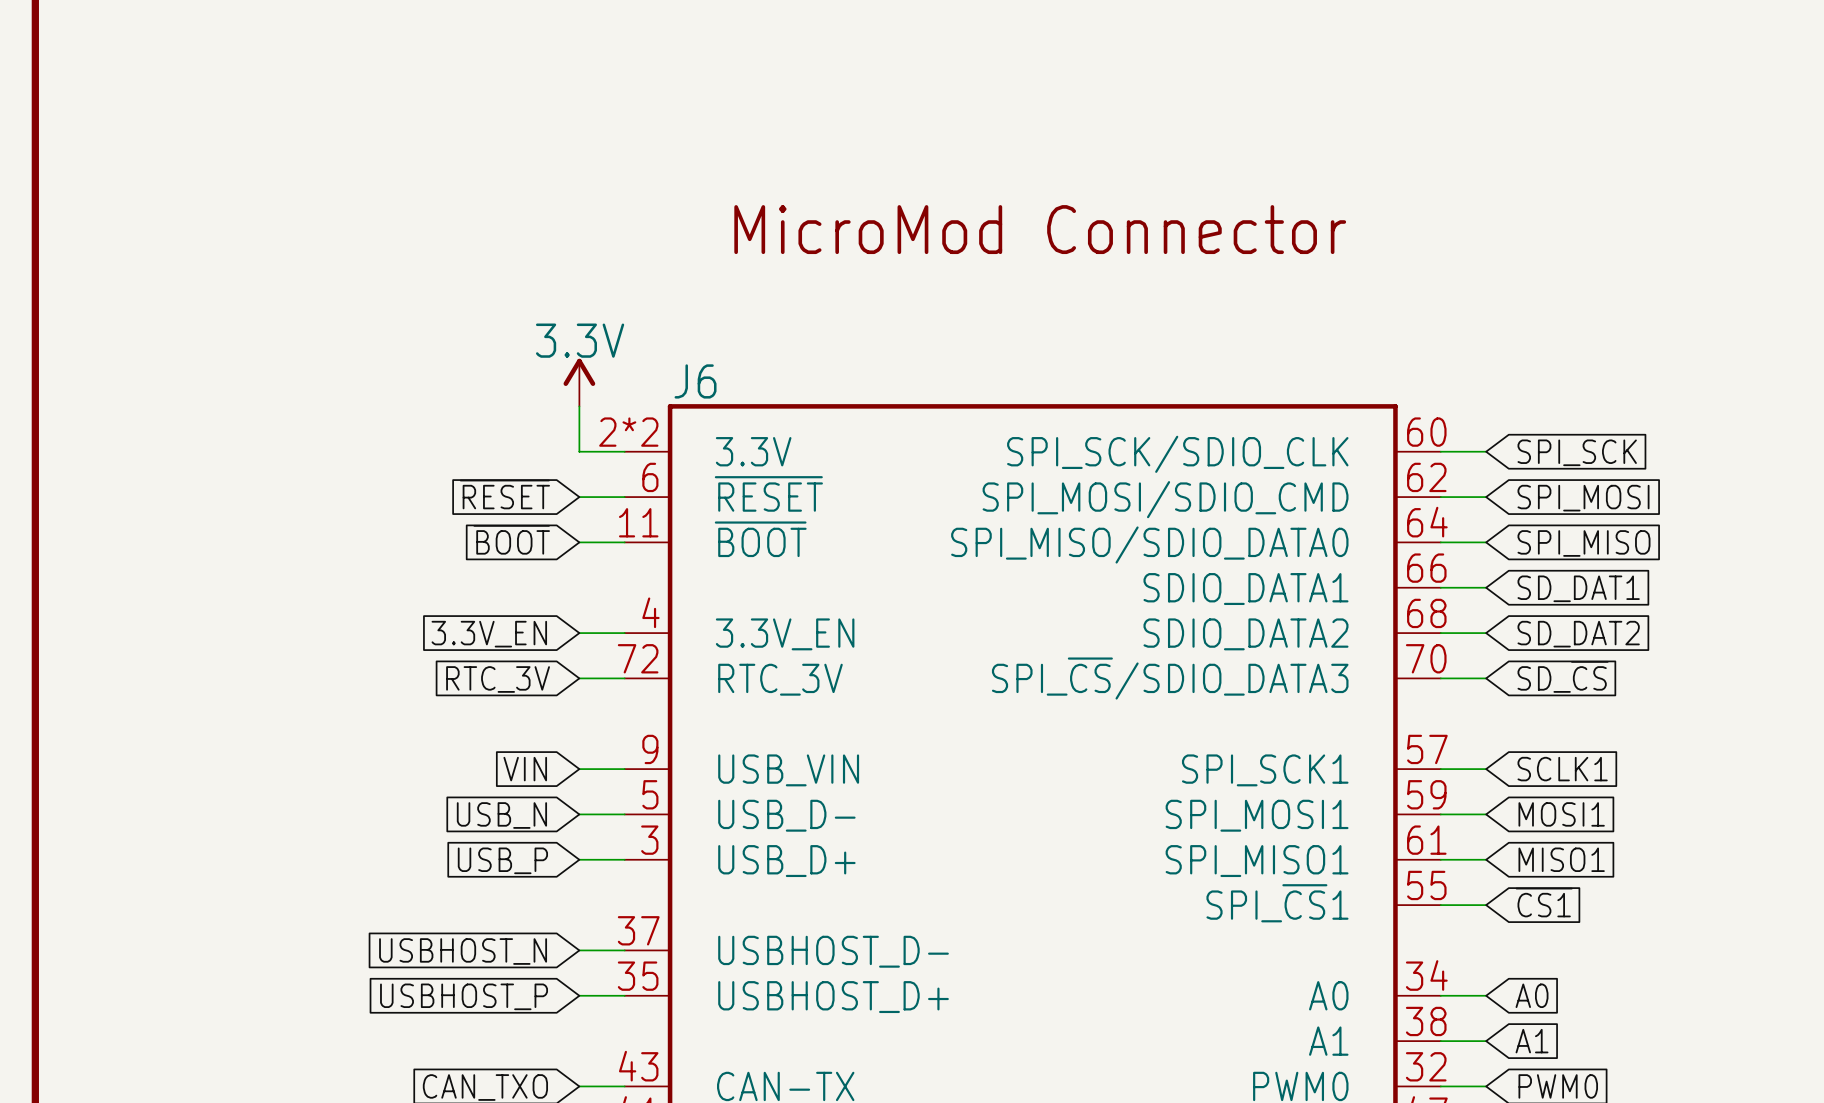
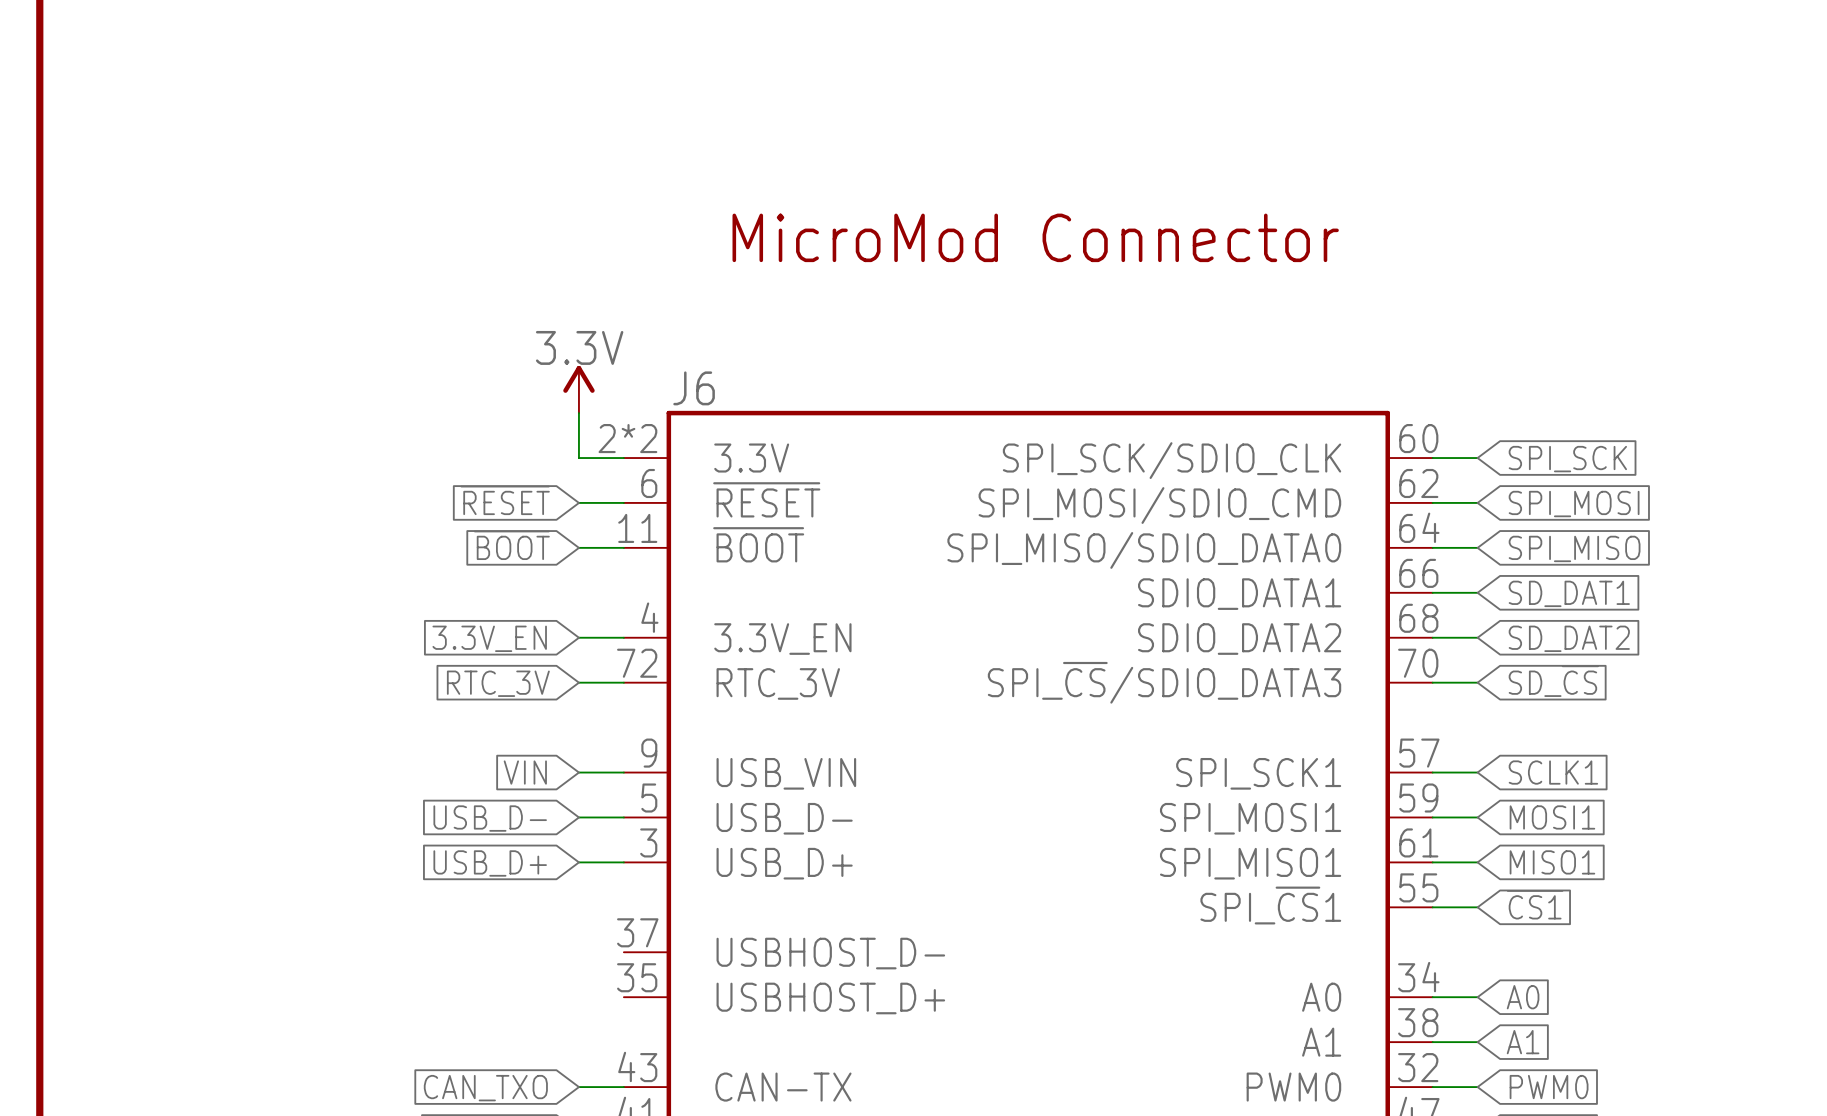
global label: USB_N (501, 815) -> USB_D- (490, 818)
global label: USB_P (502, 860) -> USB_D+ (490, 863)
wire: (579, 950) (624, 950) -> none
global label: USBHOST_N (463, 951) -> none
wire: (579, 995) (624, 995) -> none
global label: USBHOST_P (464, 996) -> none

